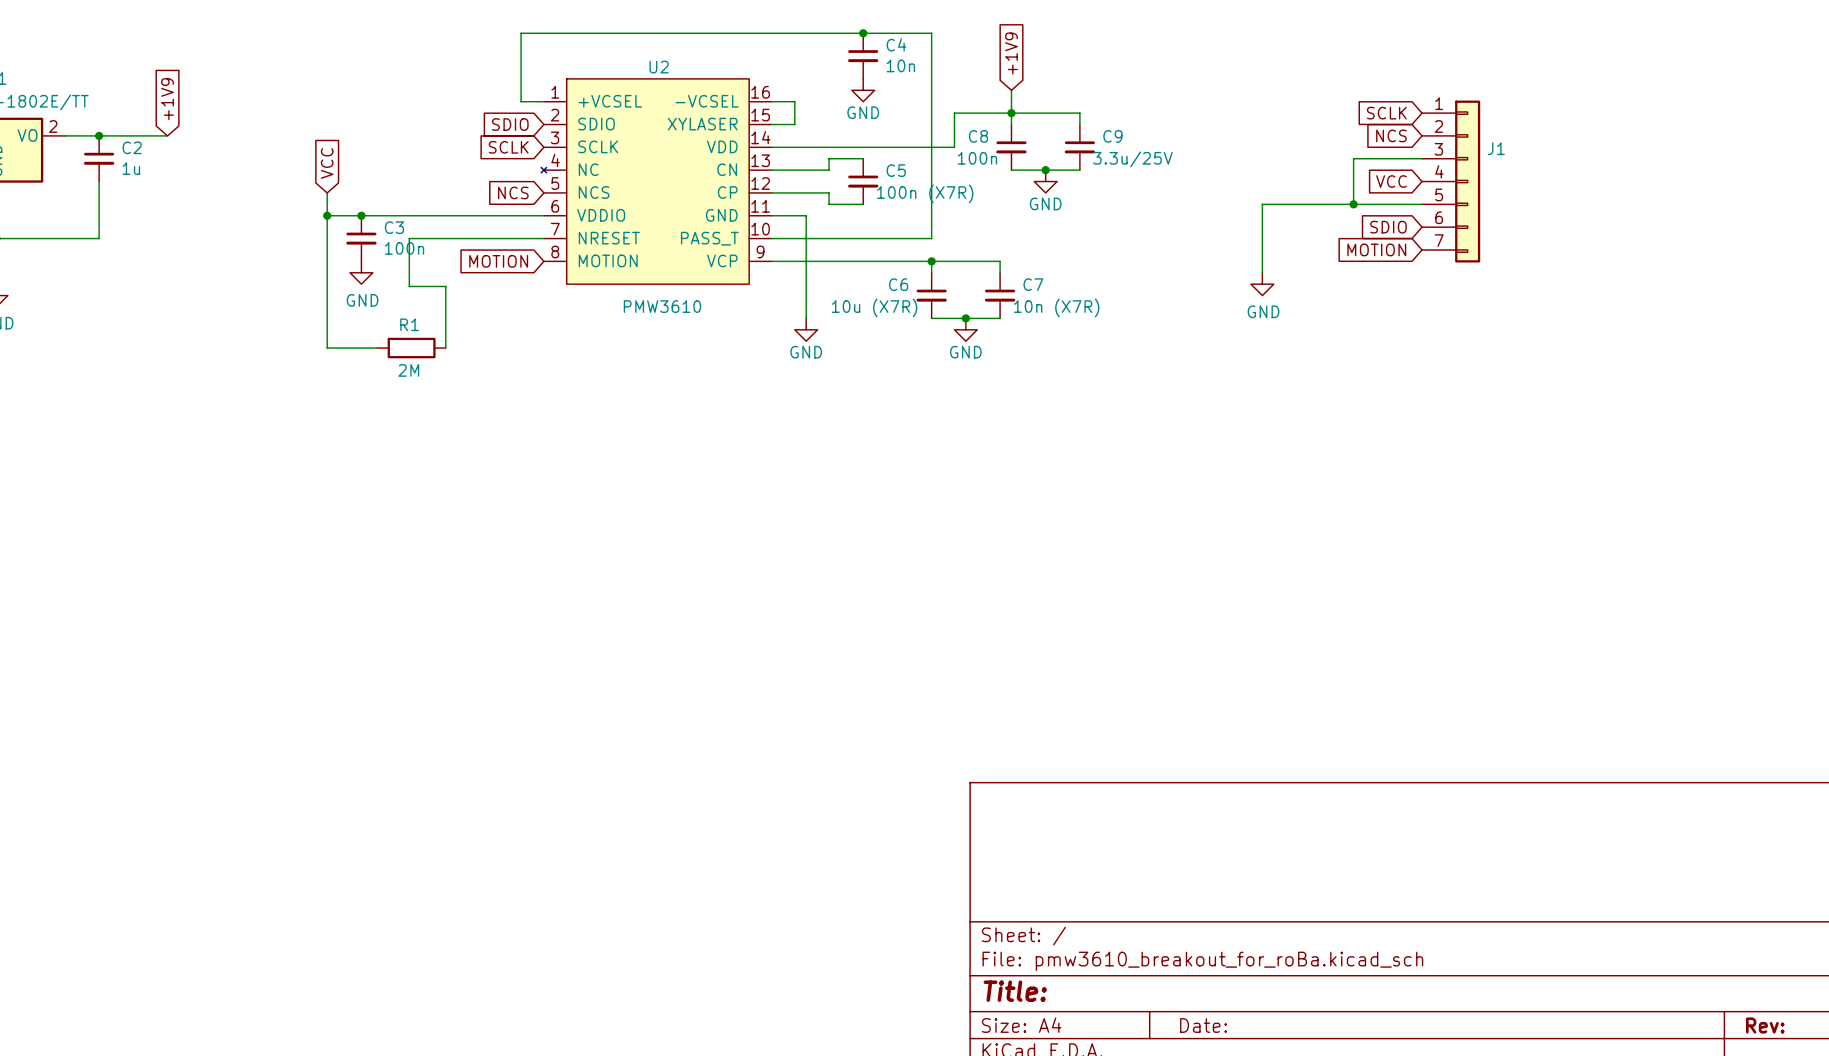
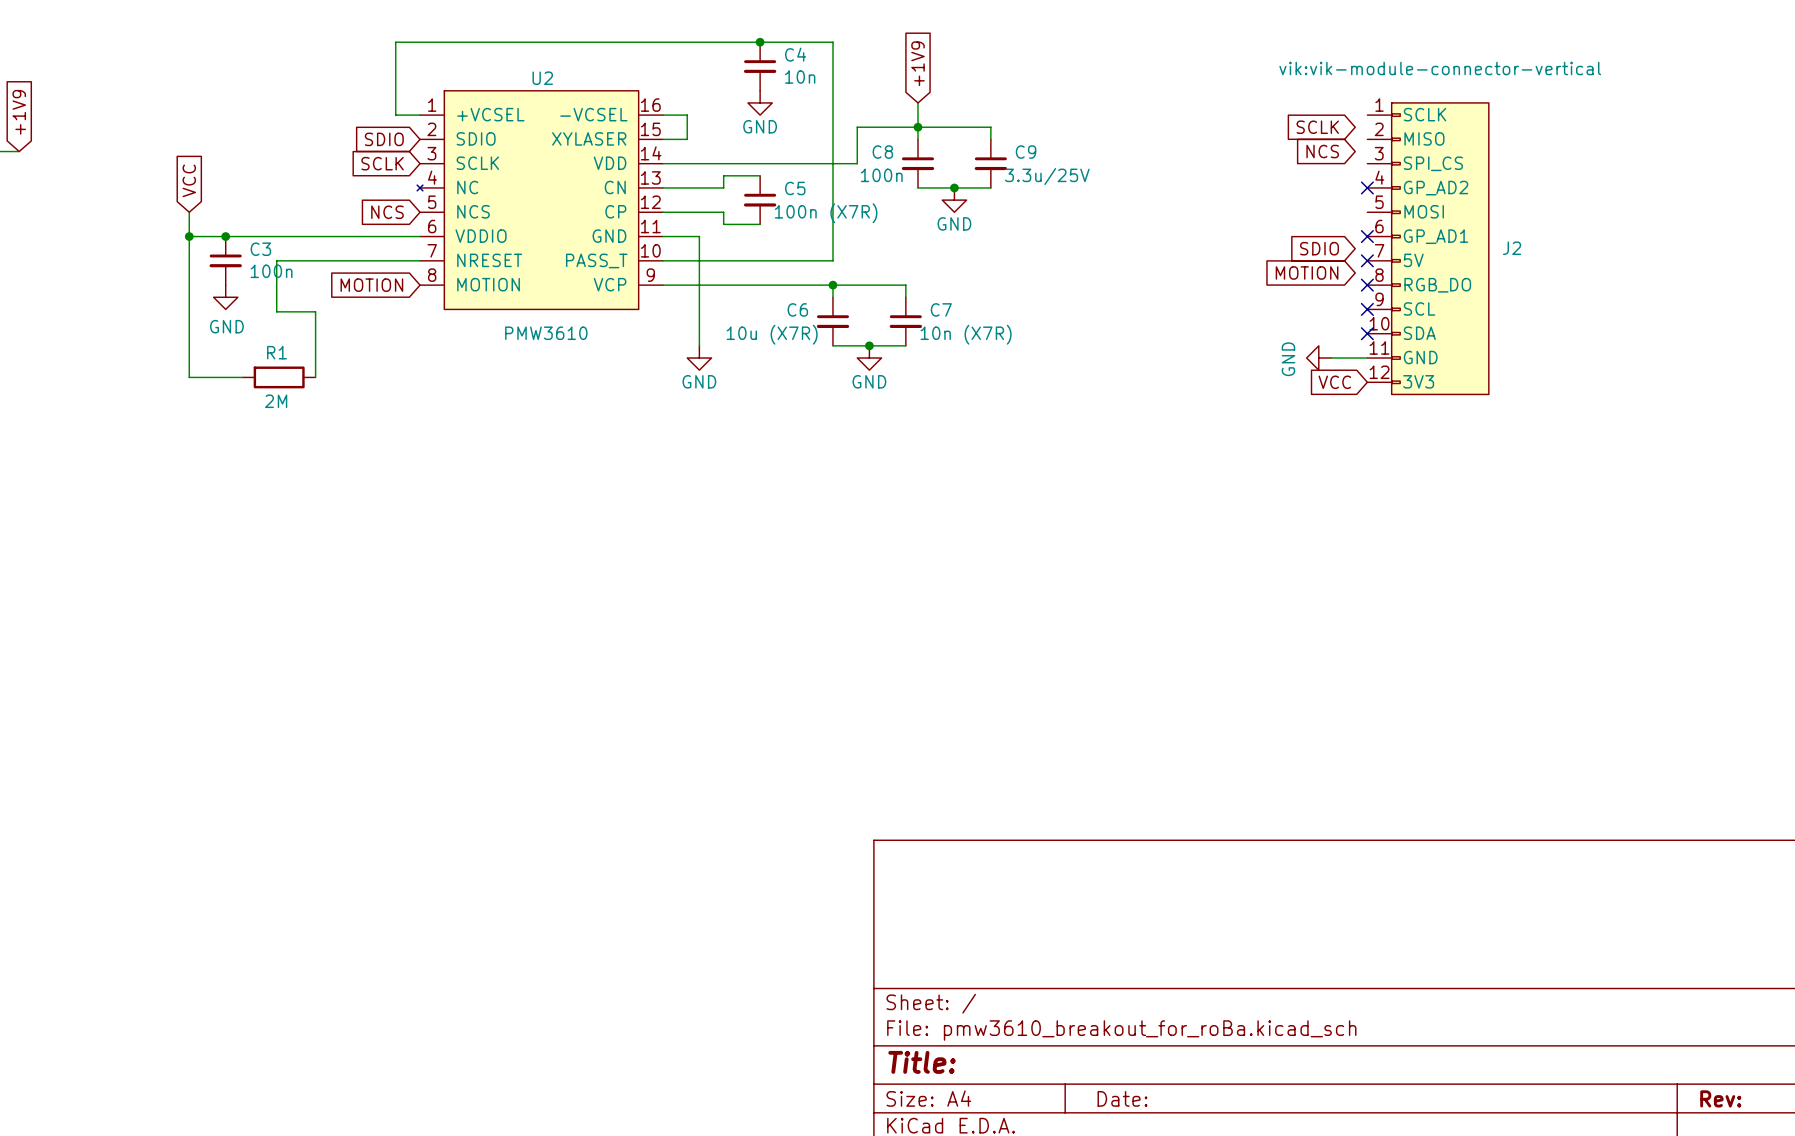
wire: (1422, 158) (1353, 158) (1353, 204) -> none
no-connect mark: none -> (1367, 187)
global label position: VCC (1391, 181) -> VCC (1334, 382)
J1: (1451, 181) -> none
junction: (1353, 204) -> none
wire: (1422, 204) (1262, 204) (1262, 272) -> none
no-connect mark: none -> (1367, 236)
J2: none -> (1428, 248)
no-connect mark: none -> (1367, 260)
no-connect mark: none -> (1367, 285)
power symbol rotation: 0° (1262, 284) -> 90° clockwise (1318, 358)
power symbol position: GND (1262, 284) -> GND (1318, 358)
no-connect mark: none -> (1367, 309)
no-connect mark: none -> (1367, 333)
wire: none -> (1330, 358) (1367, 358)

